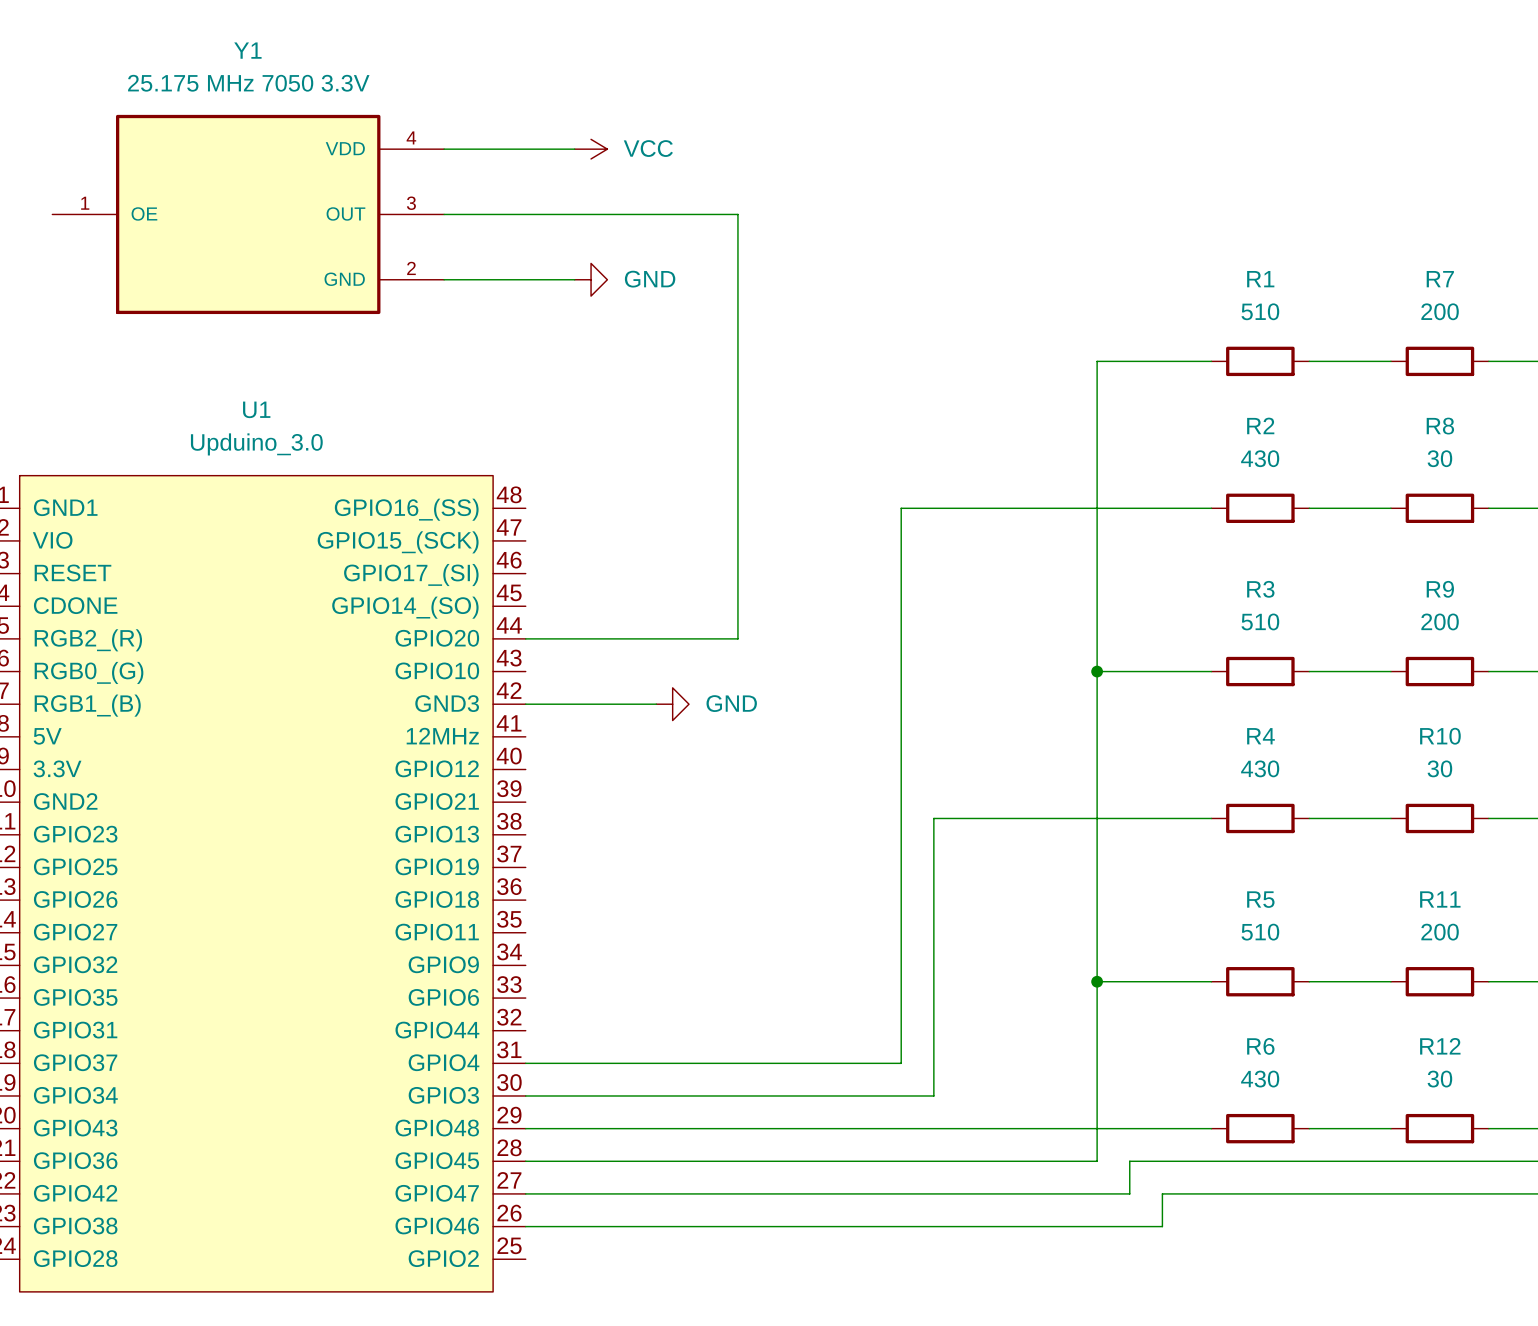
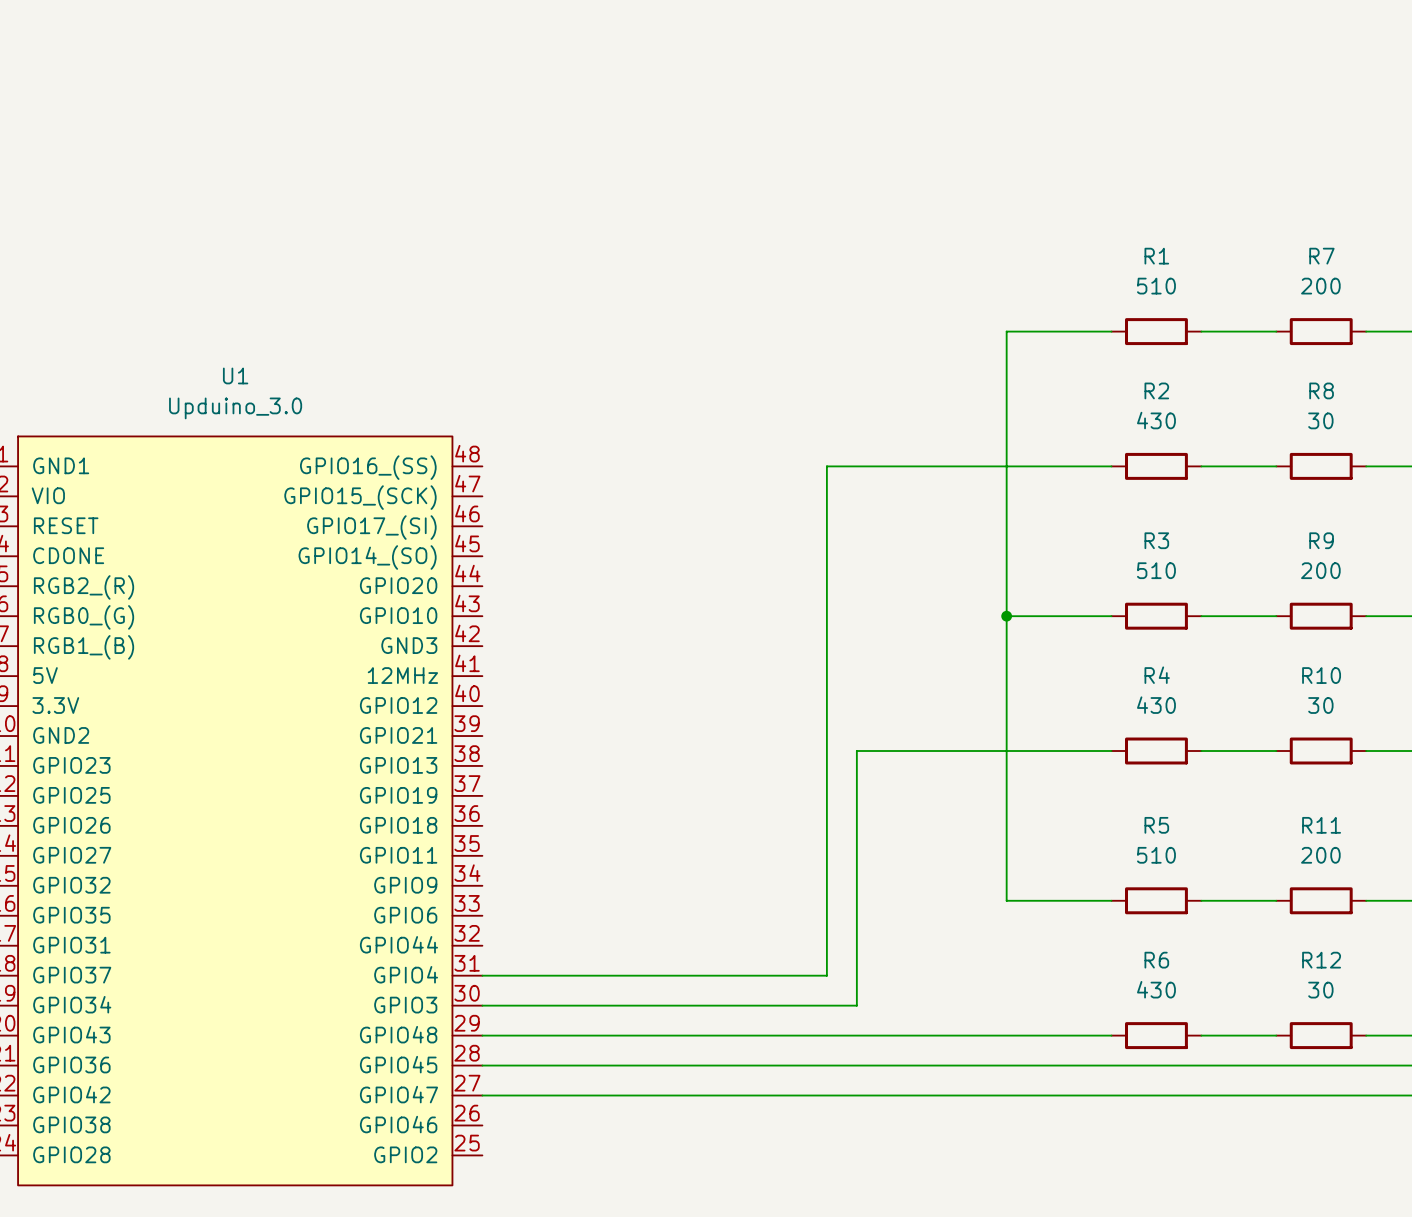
wire: (444, 149) (574, 149) -> none
power symbol: VCC (591, 149) -> none
Y1: 25.175 MHz 7050 3.3V (248, 214) -> none
wire: (444, 214) (737, 214) (737, 638) (525, 638) -> none
wire: (444, 279) (574, 279) -> none
power symbol: GND (591, 279) -> none
wire: (525, 704) (656, 704) -> none
power symbol: GND (672, 704) -> none
wire: (1097, 981) (1097, 1161) -> (1036, 1065) (1006, 1065)
junction: (1097, 981) -> none
wire: (1129, 1161) (1129, 1193) -> (1066, 1095) (1036, 1095)
wire: (1162, 1193) (1162, 1226) (525, 1226) -> none

